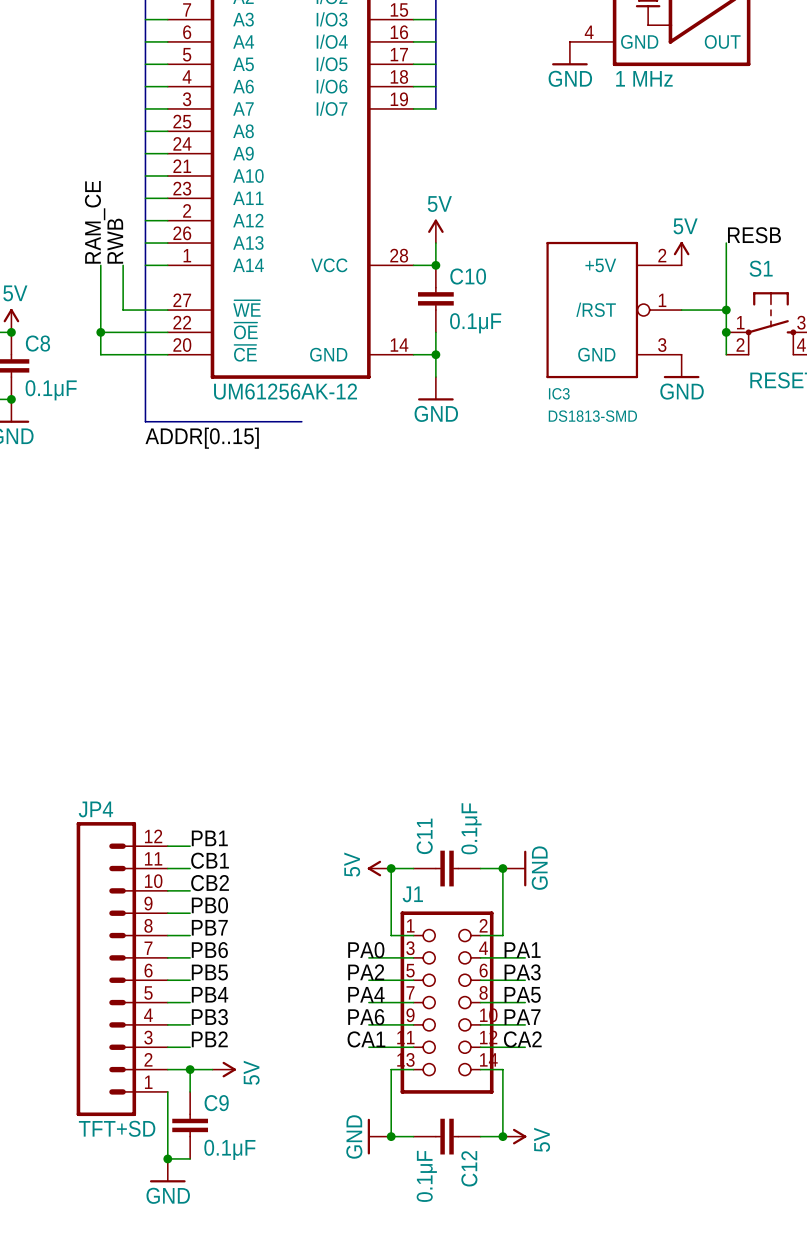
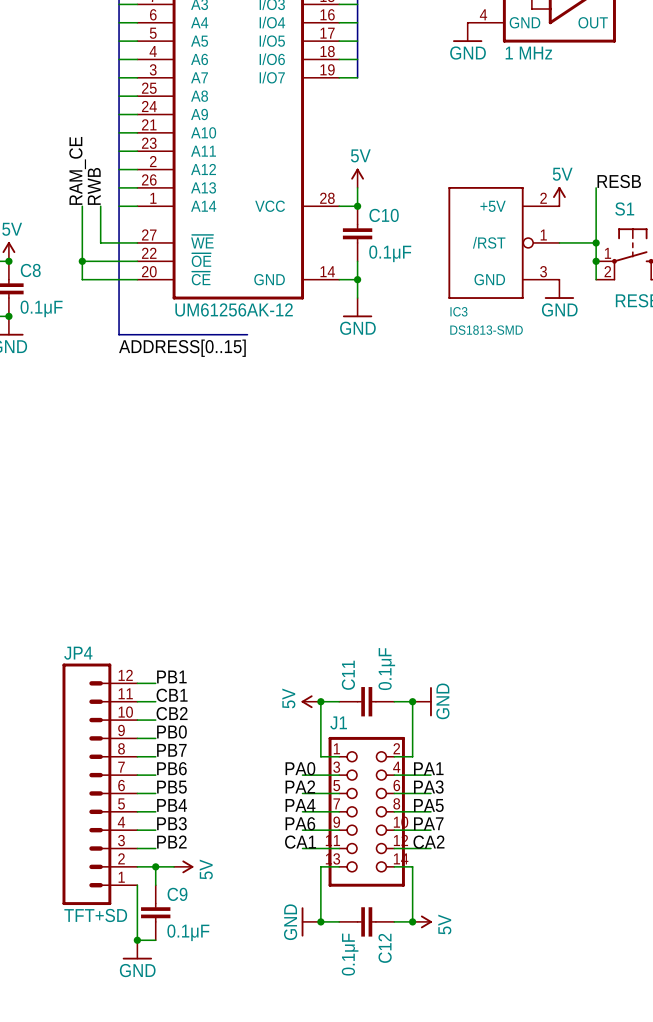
label: ADDR[0..15] (202, 438) -> ADDRESS[0..15] (182, 348)

